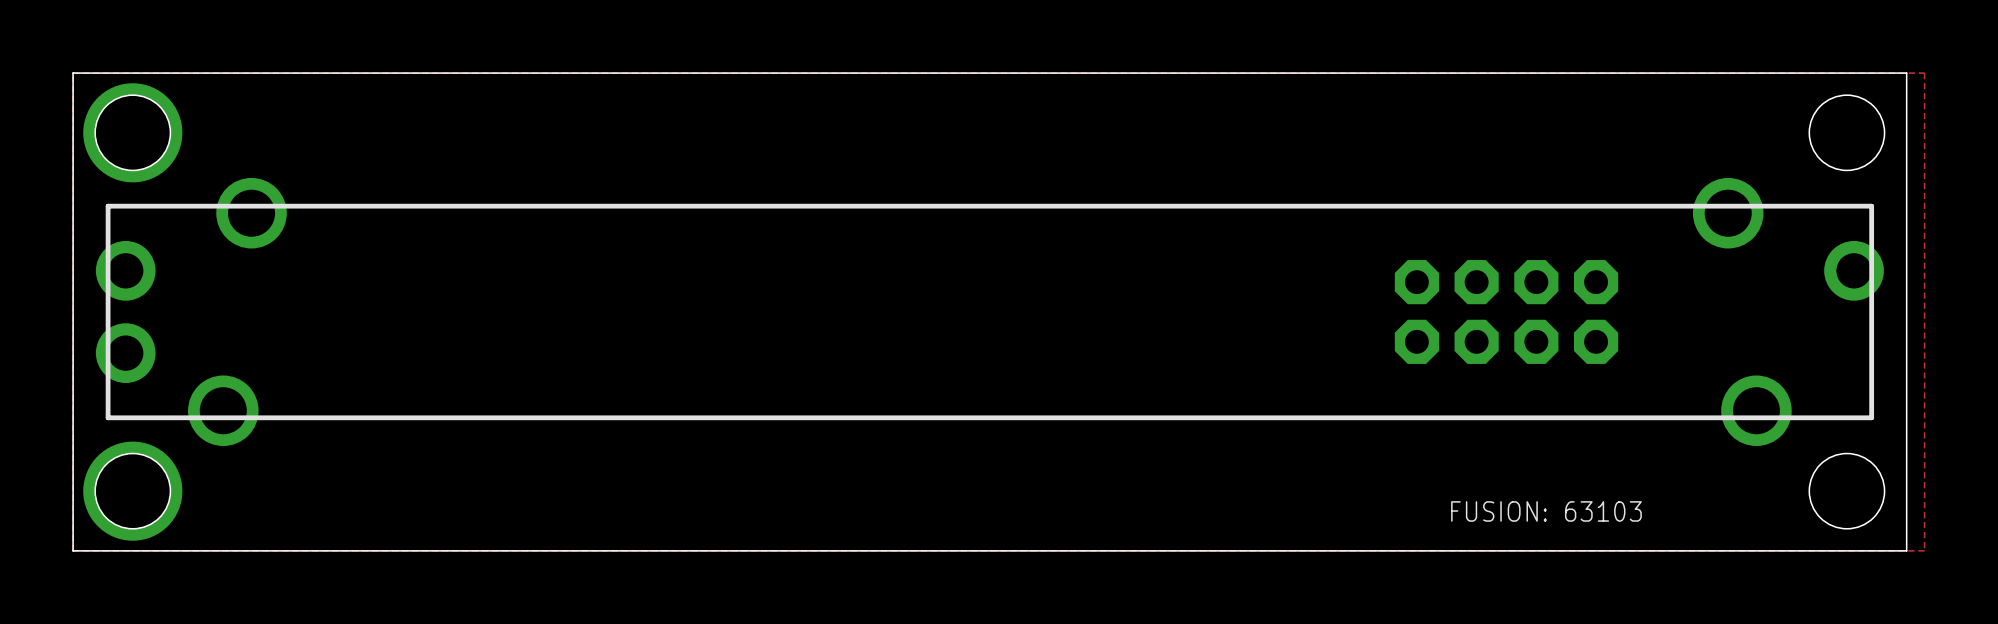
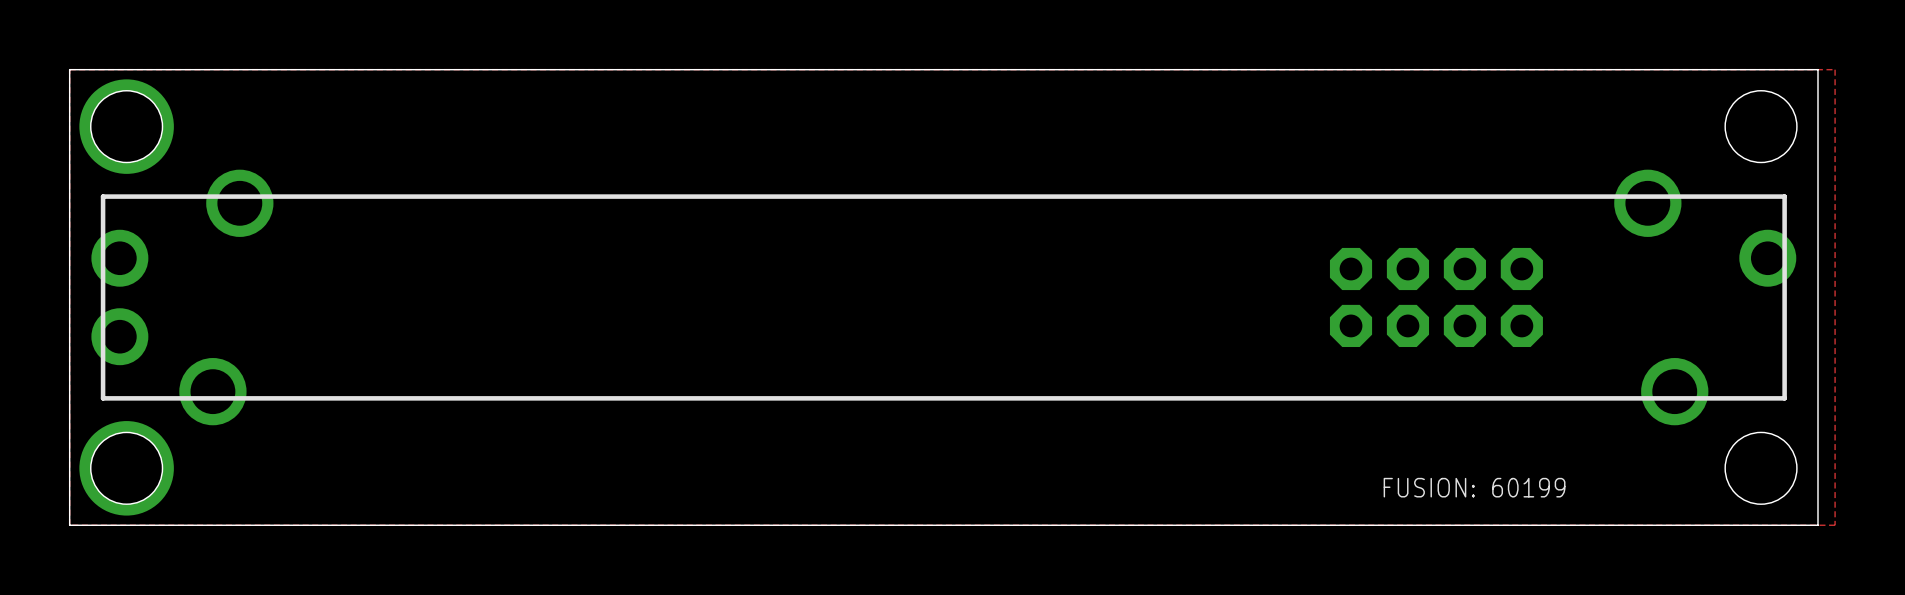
text: FUSION: 63103 (1546, 511) -> FUSION: 60199 (1474, 487)

